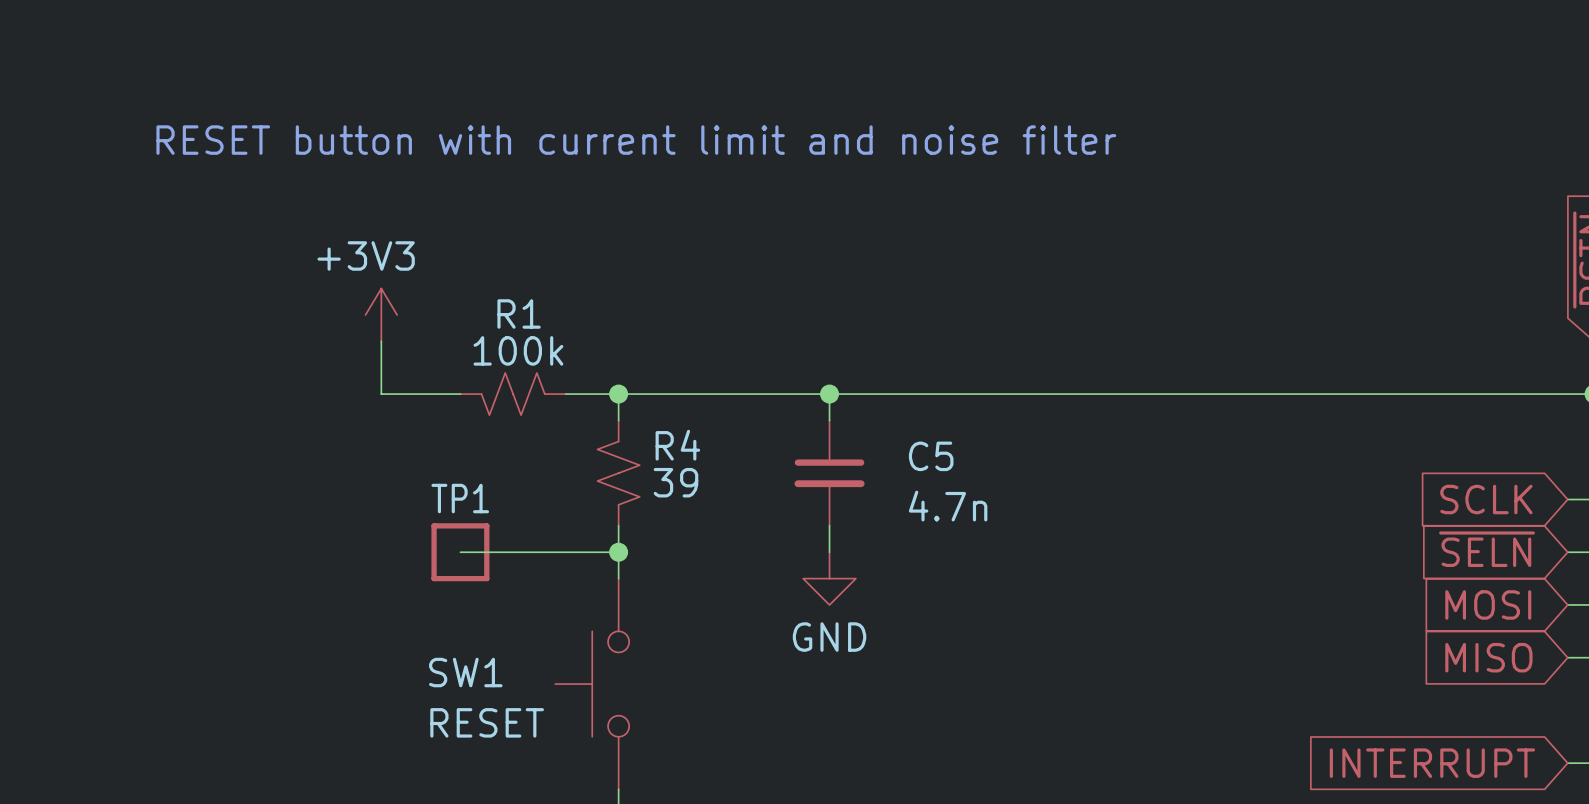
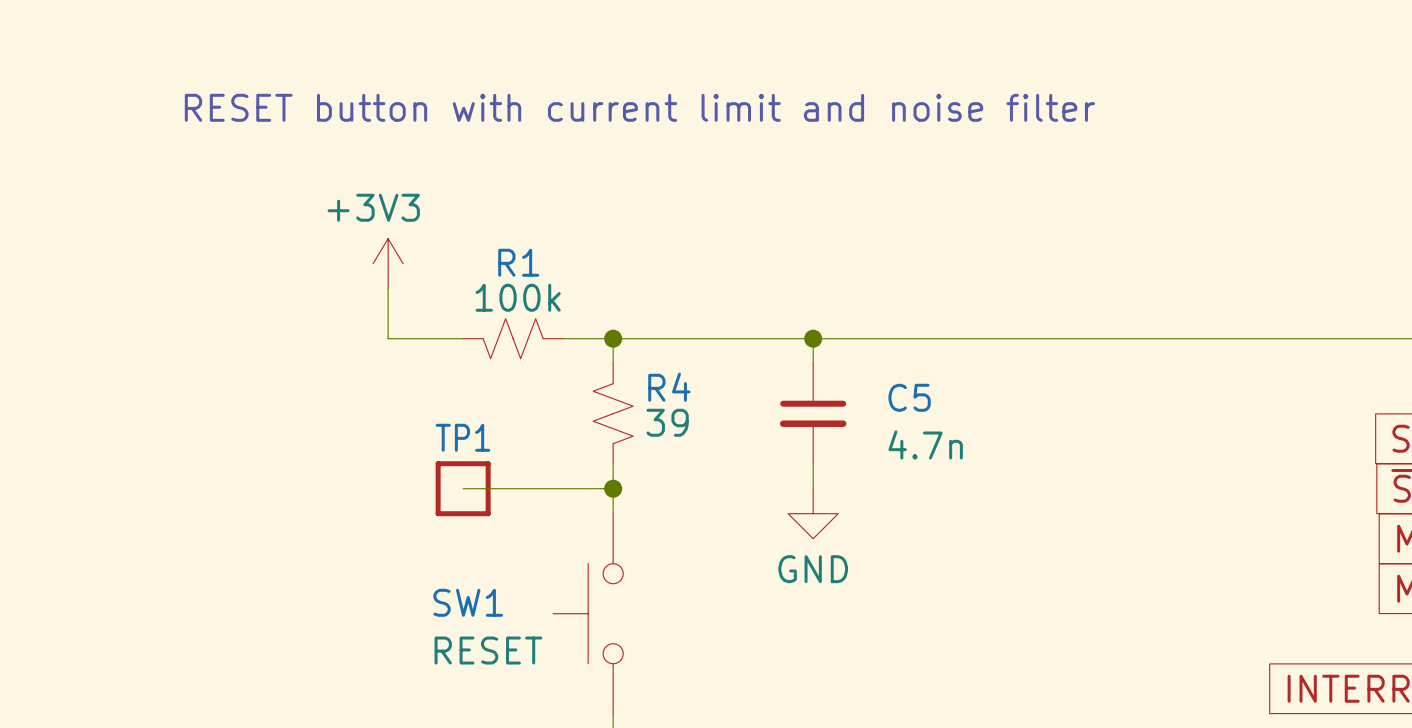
text position: RESET button with current limit and noise filter (636, 140) -> RESET button with current limit and noise filter (639, 107)

